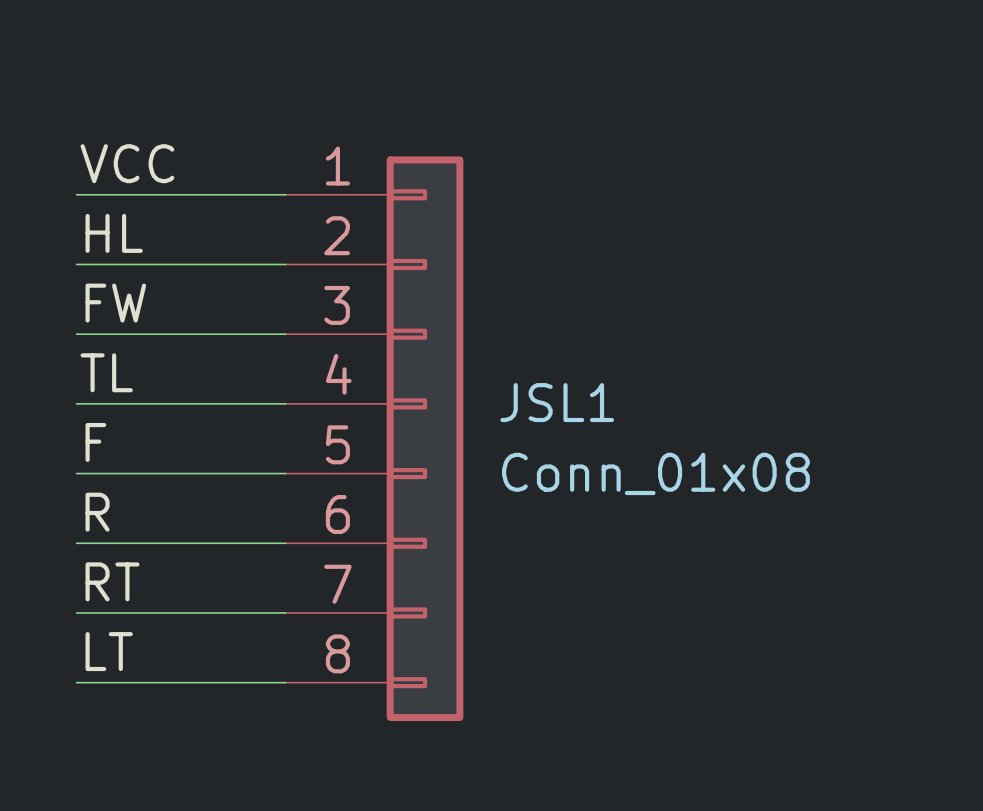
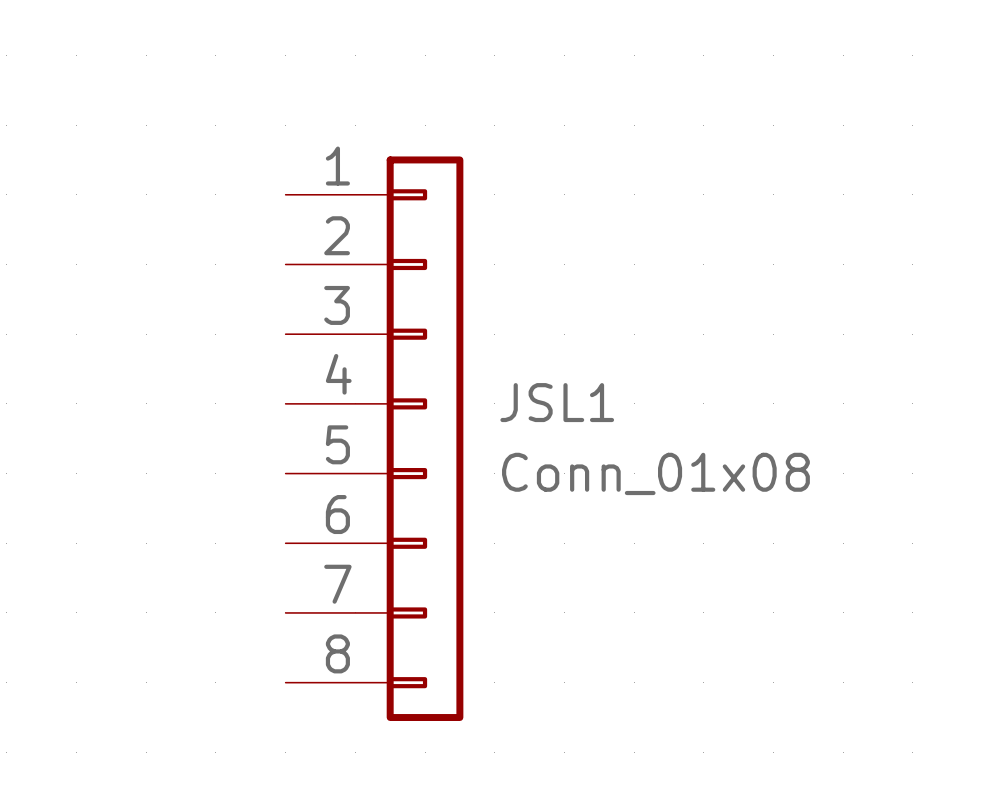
label: VCC (127, 163) -> none
wire: (76, 194) (285, 194) -> none
label: HL (114, 233) -> none
wire: (76, 264) (285, 264) -> none
label: FW (115, 303) -> none
wire: (76, 334) (285, 334) -> none
label: TL (106, 372) -> none
wire: (76, 403) (285, 403) -> none
label: F (95, 442) -> none
wire: (76, 473) (285, 473) -> none
label: R (97, 512) -> none
wire: (76, 543) (285, 543) -> none
label: RT (112, 581) -> none
wire: (76, 612) (285, 612) -> none
label: LT (109, 651) -> none
wire: (76, 682) (285, 682) -> none

